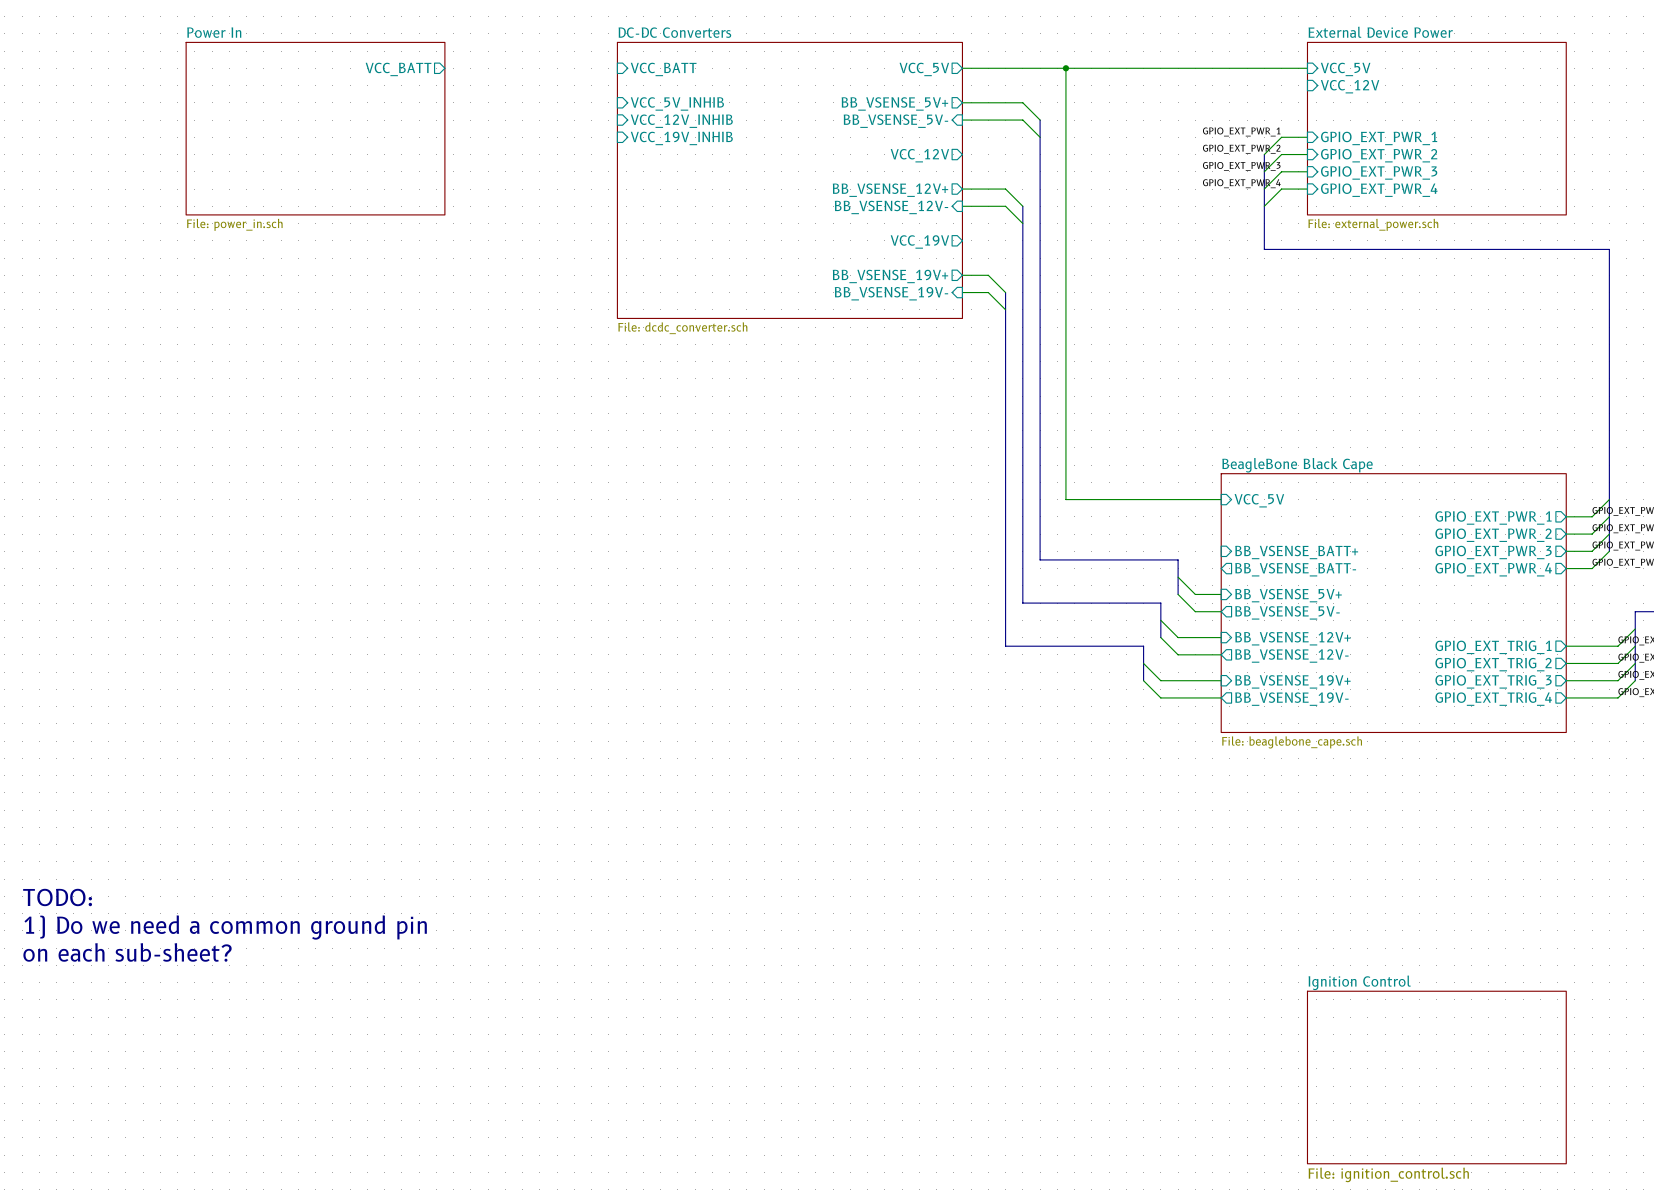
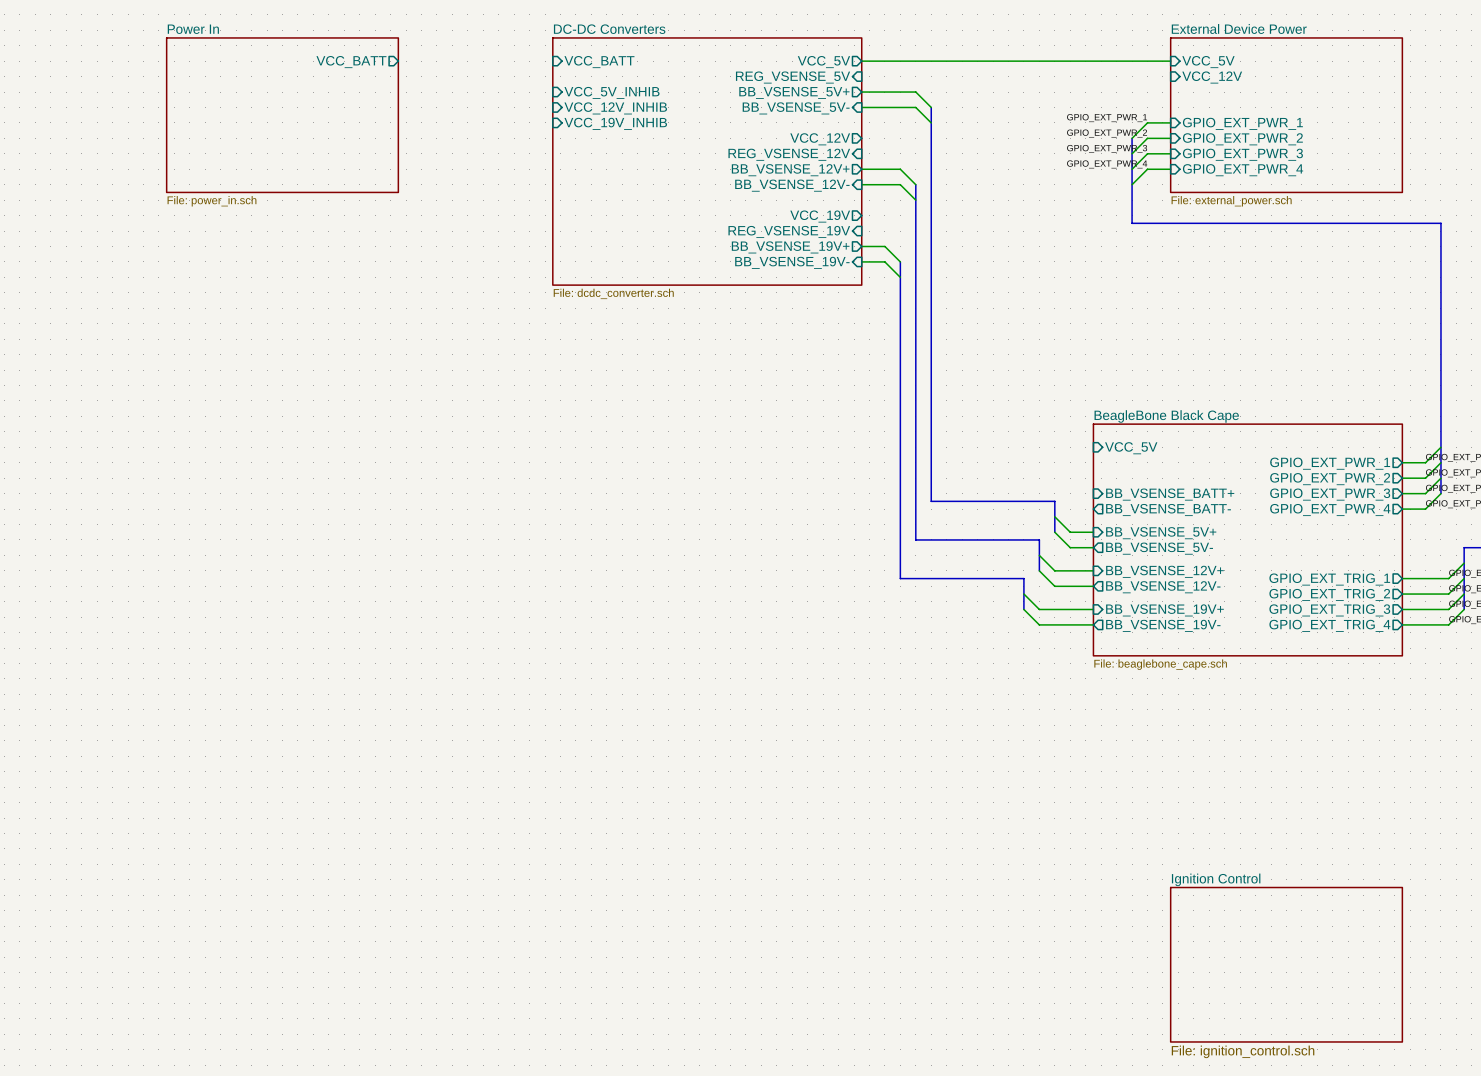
wire: (1065, 68) (1065, 499) (1221, 499) -> none
junction: (1065, 68) -> none
sheet pin: none -> REG_VSENSE_5V (793, 77)
sheet pin: none -> REG_VSENSE_12V (789, 154)
sheet pin: none -> REG_VSENSE_19V (789, 231)
text: TODO: (57, 897) -> none
text: 1) Do we need a common ground pin (225, 927) -> none
text: on each sub-sheet? (127, 952) -> none

